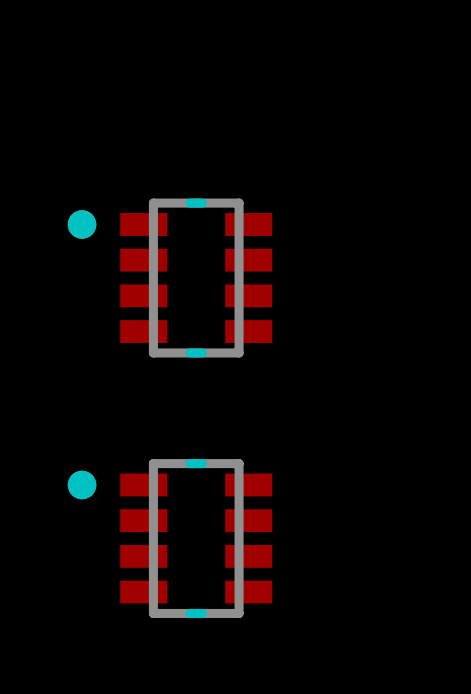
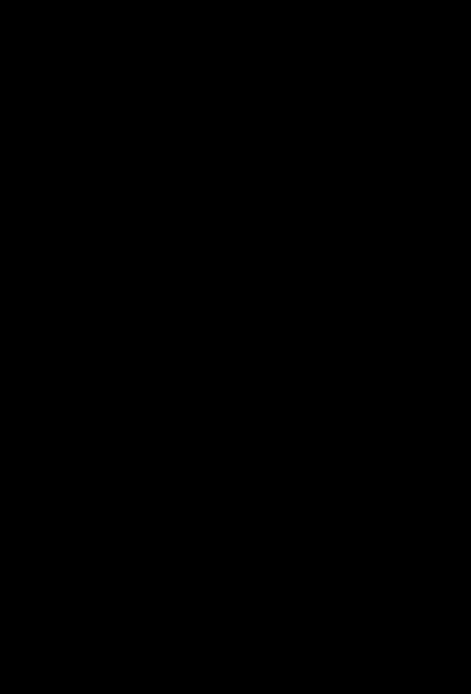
part: (170, 278) -> none
part: (170, 538) -> none

